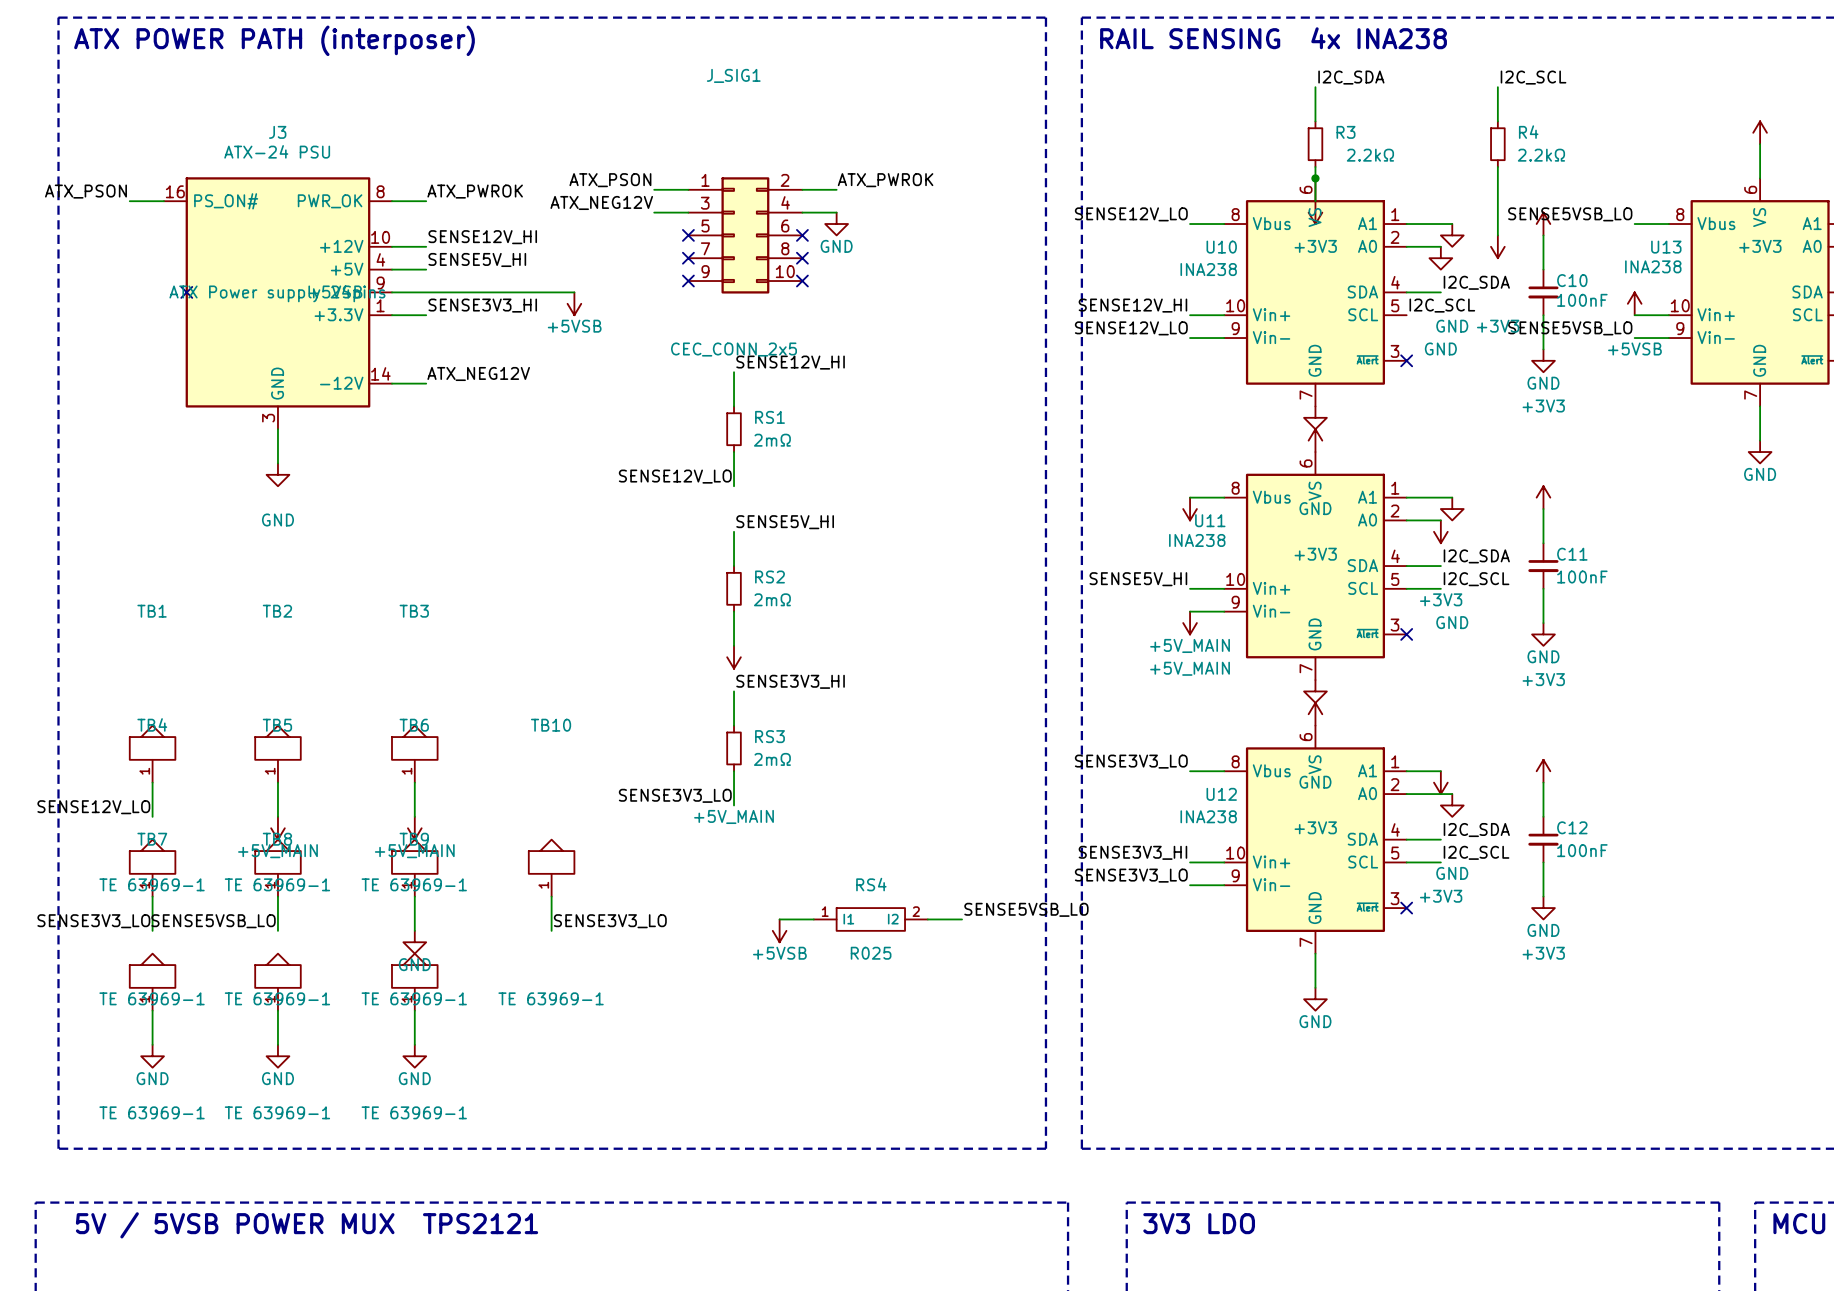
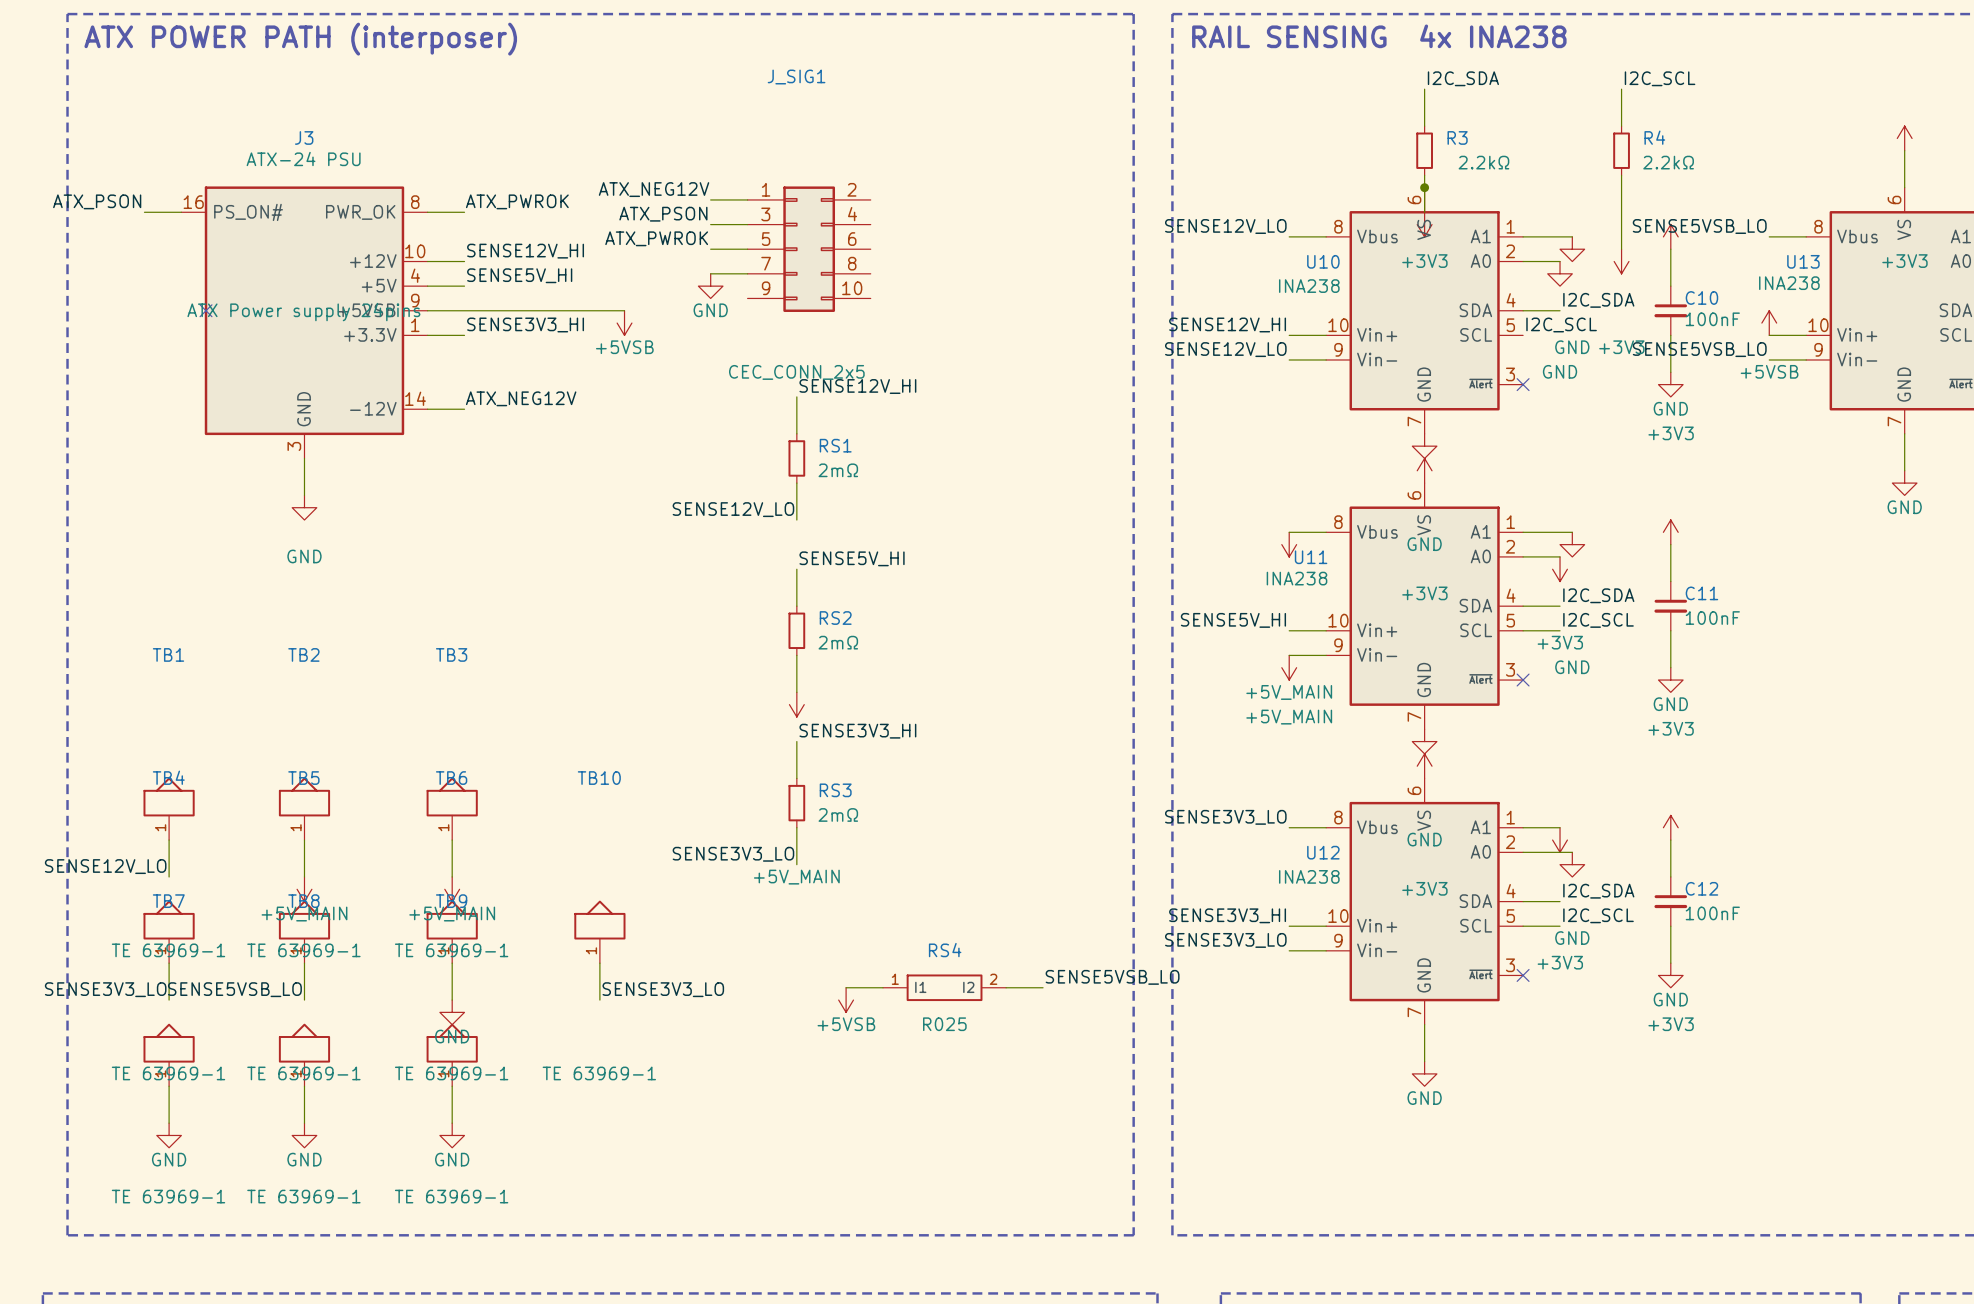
label: ATX_PSON (610, 180) -> ATX_NEG12V (654, 189)
label position: ATX_PWROK (885, 180) -> ATX_PWROK (656, 238)
wire: (802, 189) (836, 189) -> (710, 249) (747, 249)
label: ATX_NEG12V (601, 202) -> ATX_PSON (663, 214)
wire: (802, 212) (836, 212) -> (710, 273) (747, 273)
power symbol position: GND (836, 224) -> GND (710, 286)
no-connect mark: (688, 235) -> none
no-connect mark: (802, 235) -> none
no-connect mark: (688, 258) -> none
no-connect mark: (802, 258) -> none
no-connect mark: (688, 281) -> none
no-connect mark: (802, 281) -> none

